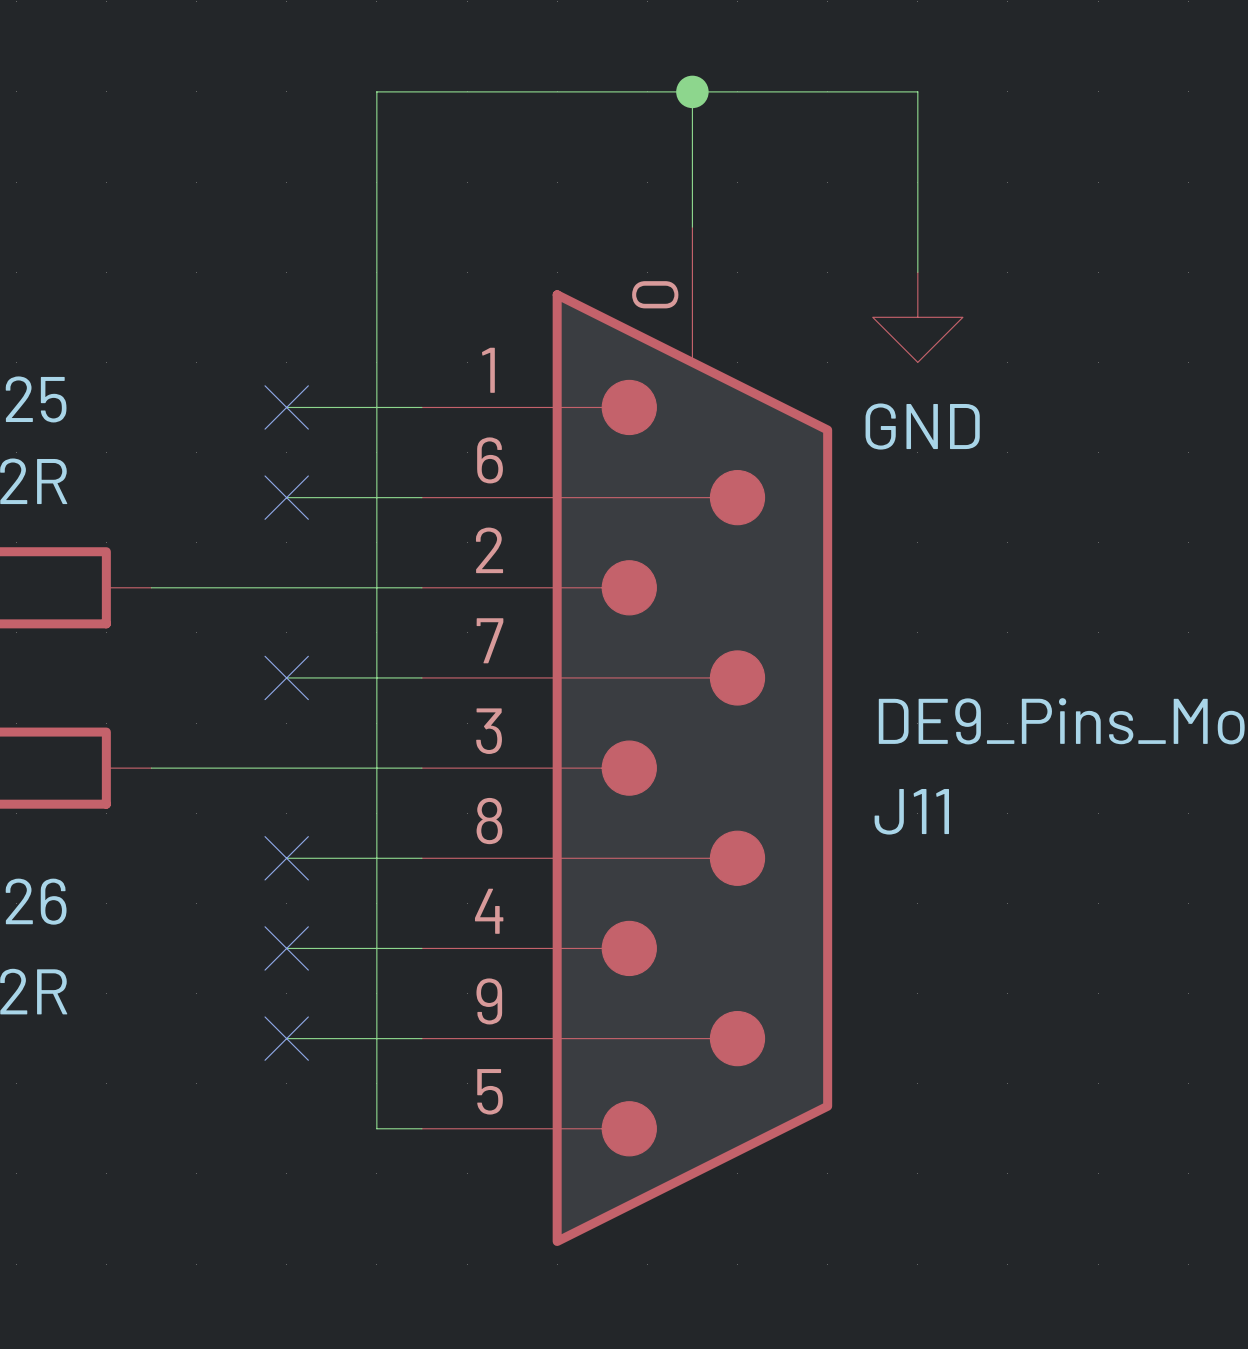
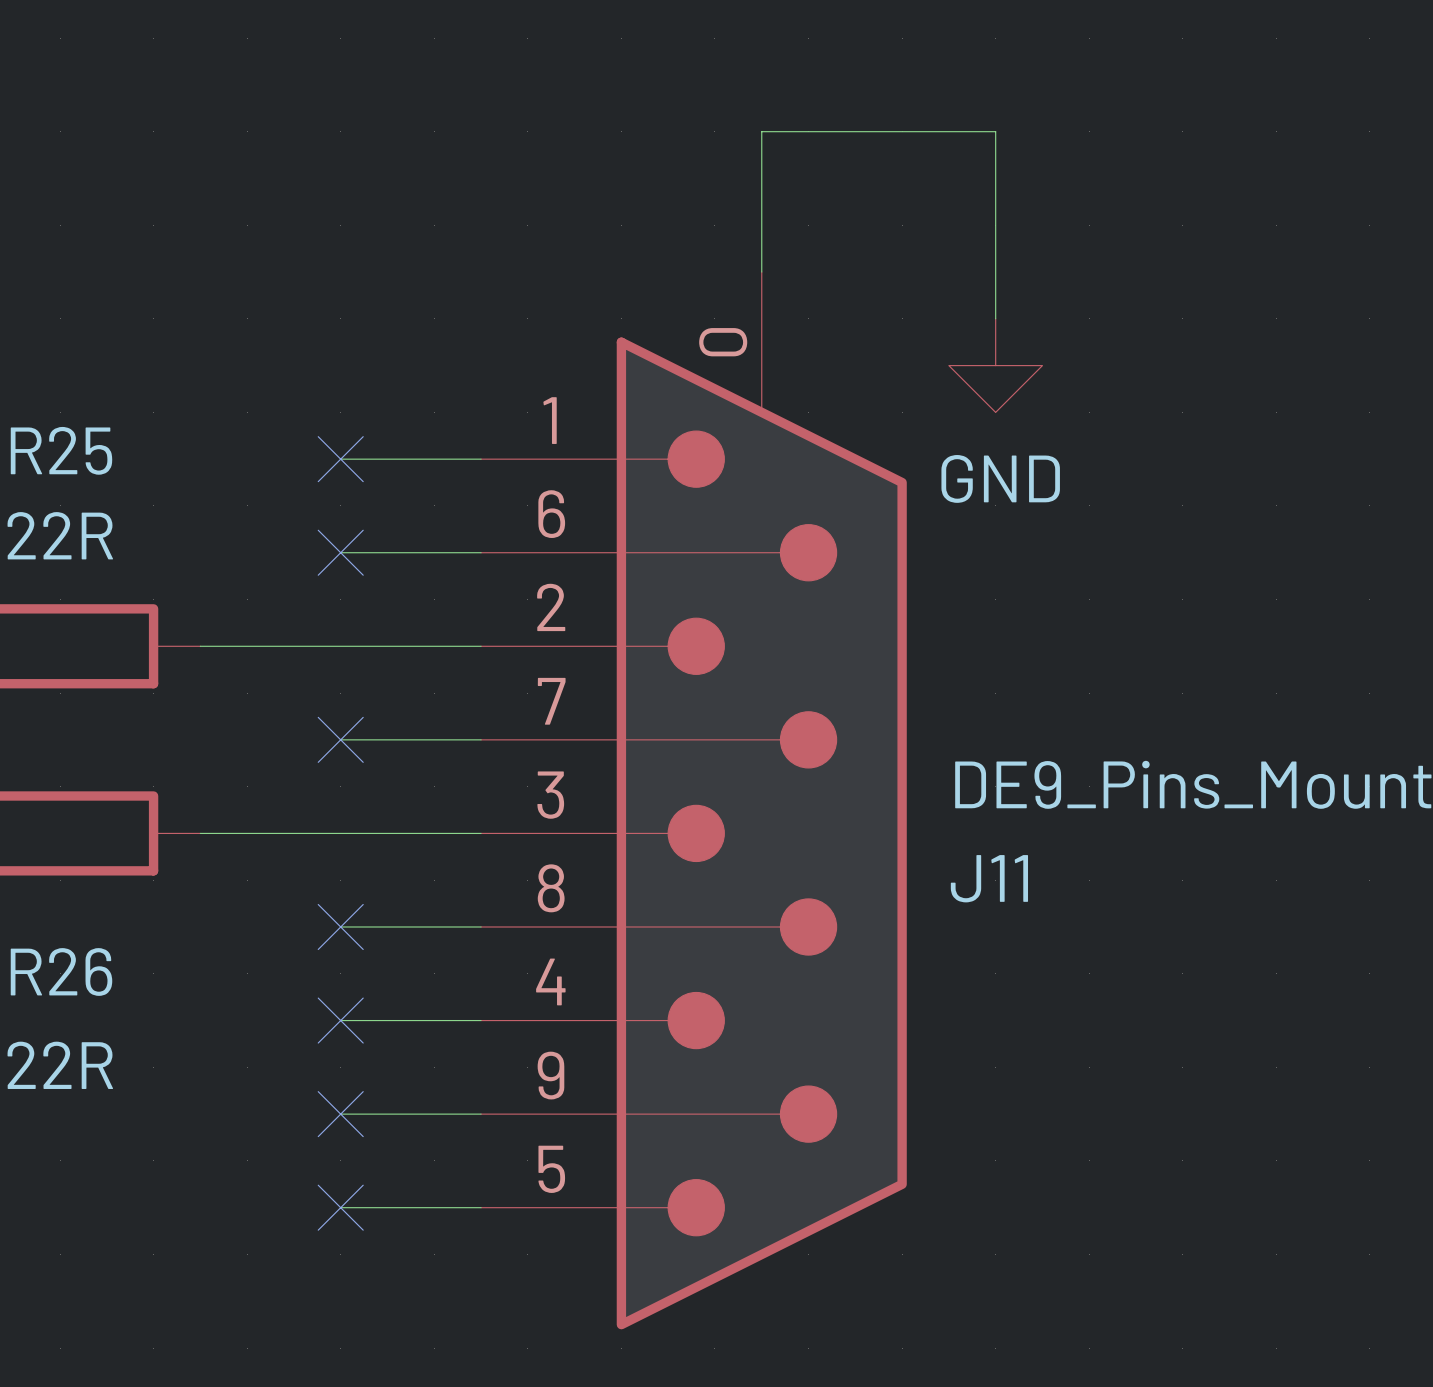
wire: (692, 91) (376, 91) (376, 1128) -> (340, 1207) (434, 1207)
junction: (692, 91) -> none
no-connect mark: none -> (340, 1207)

